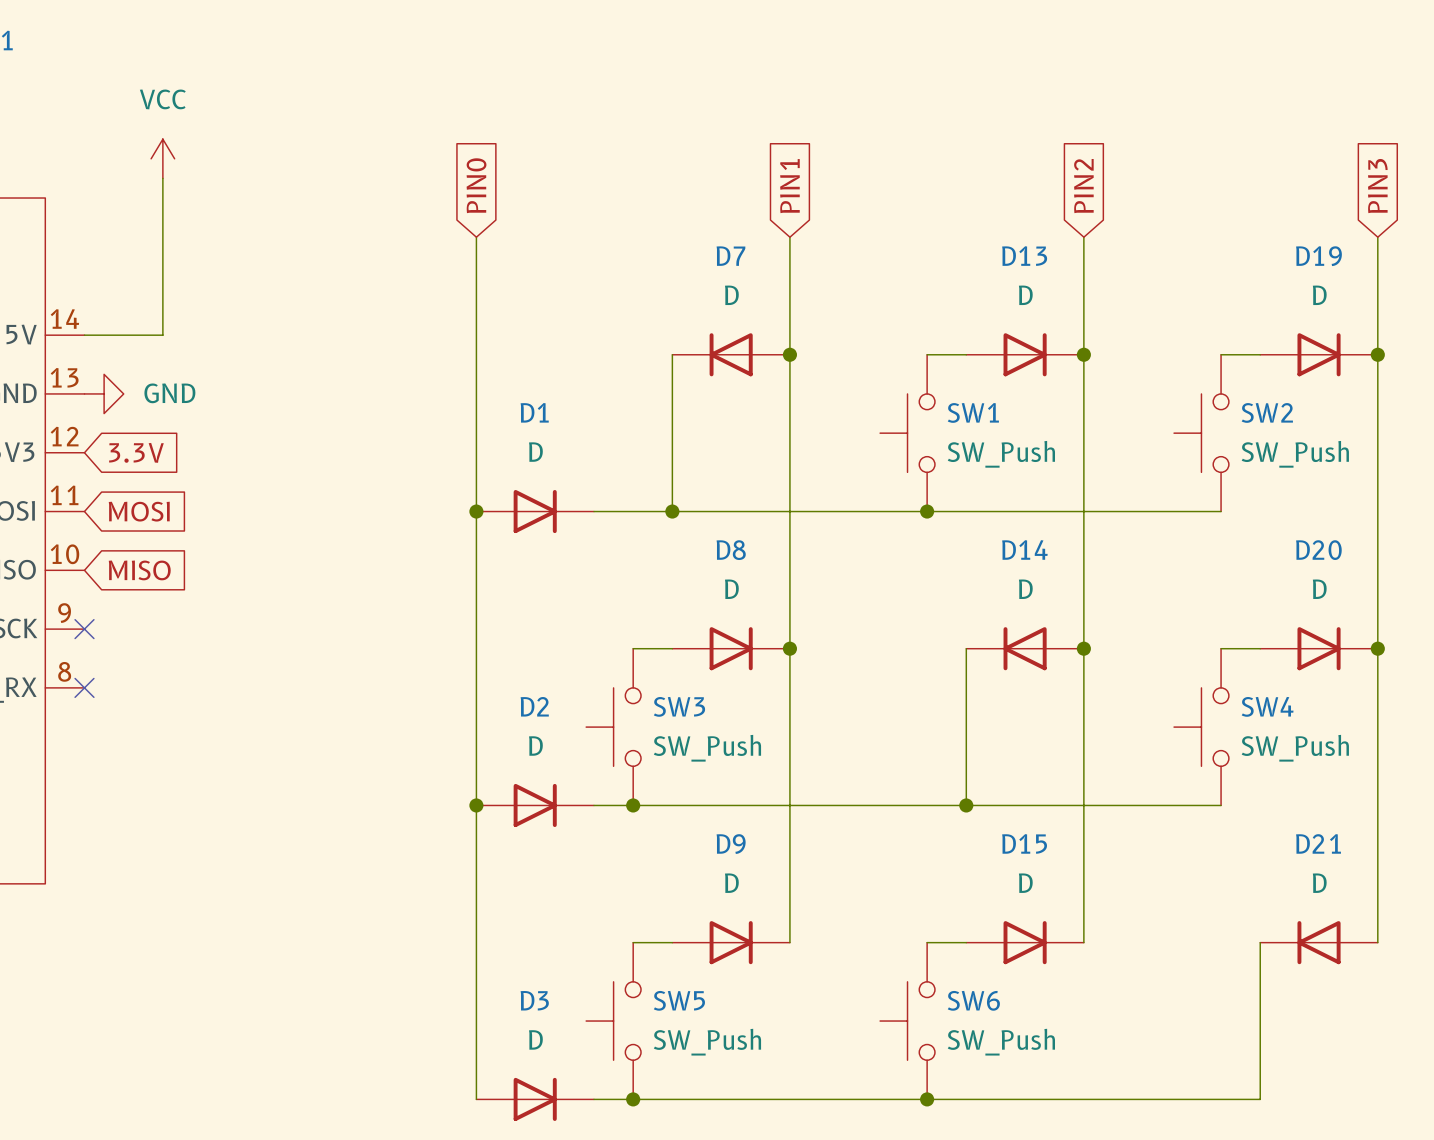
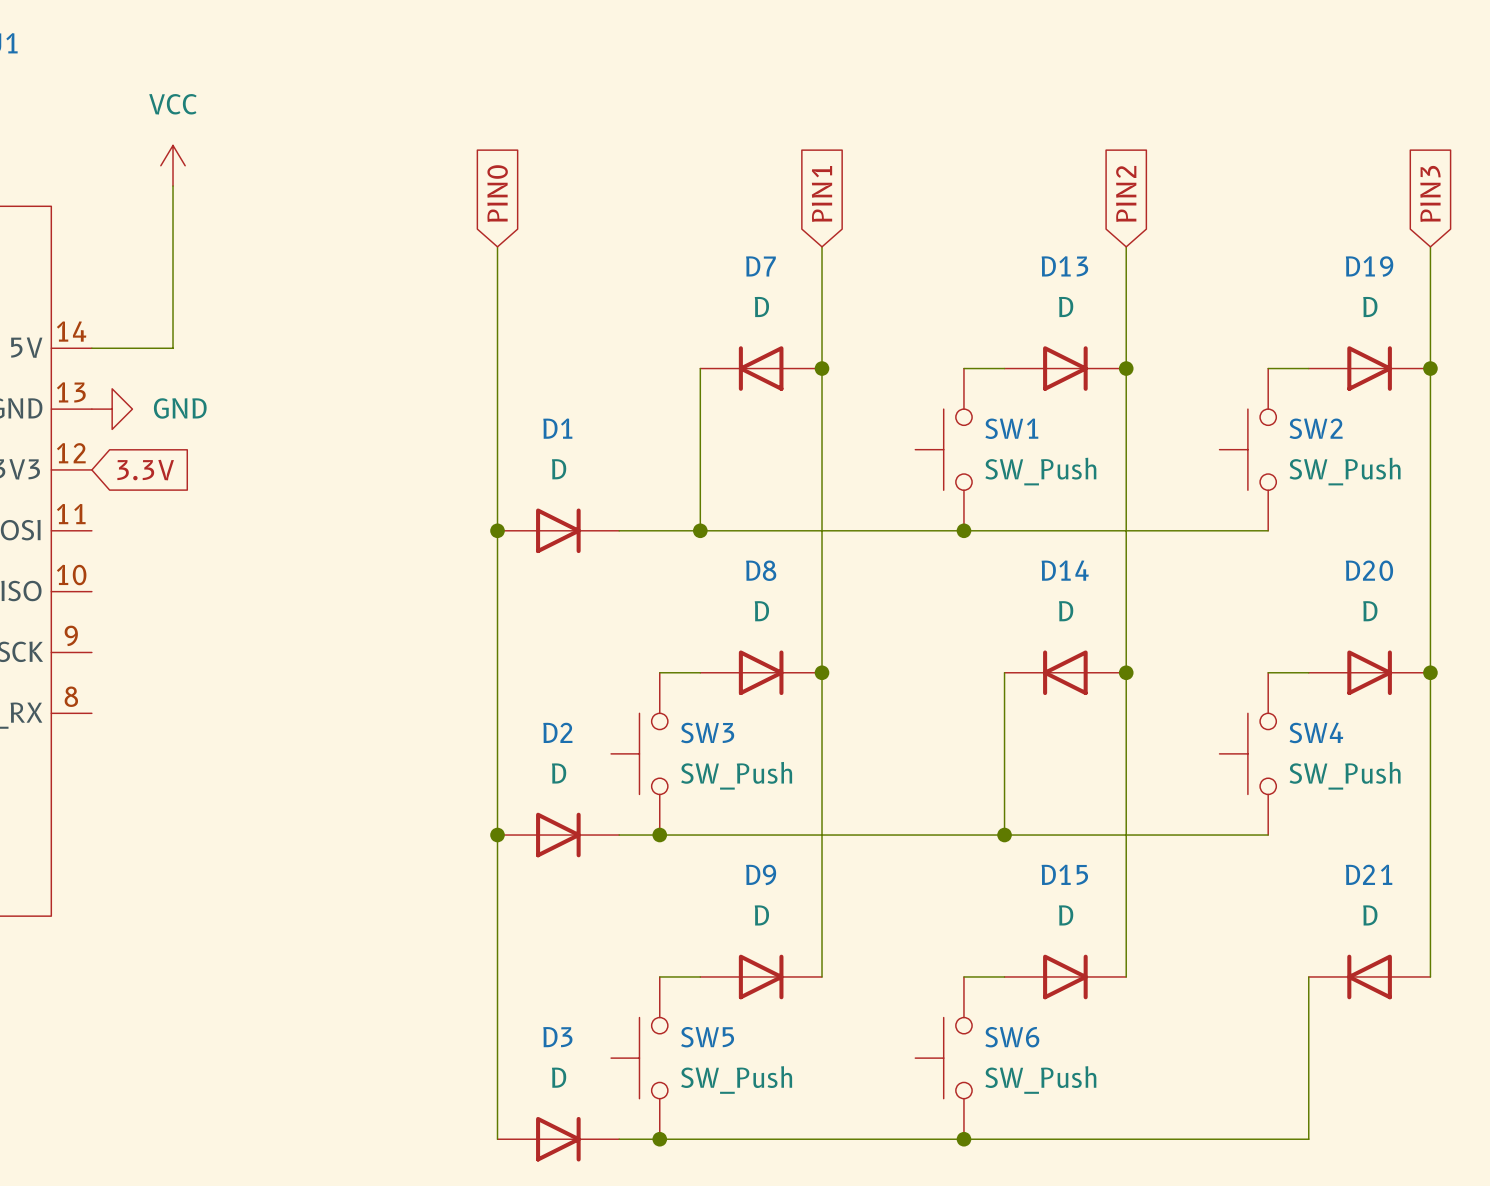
global label: MOSI (139, 511) -> none
global label: MISO (139, 570) -> none
no-connect mark: (84, 629) -> none
no-connect mark: (84, 687) -> none

